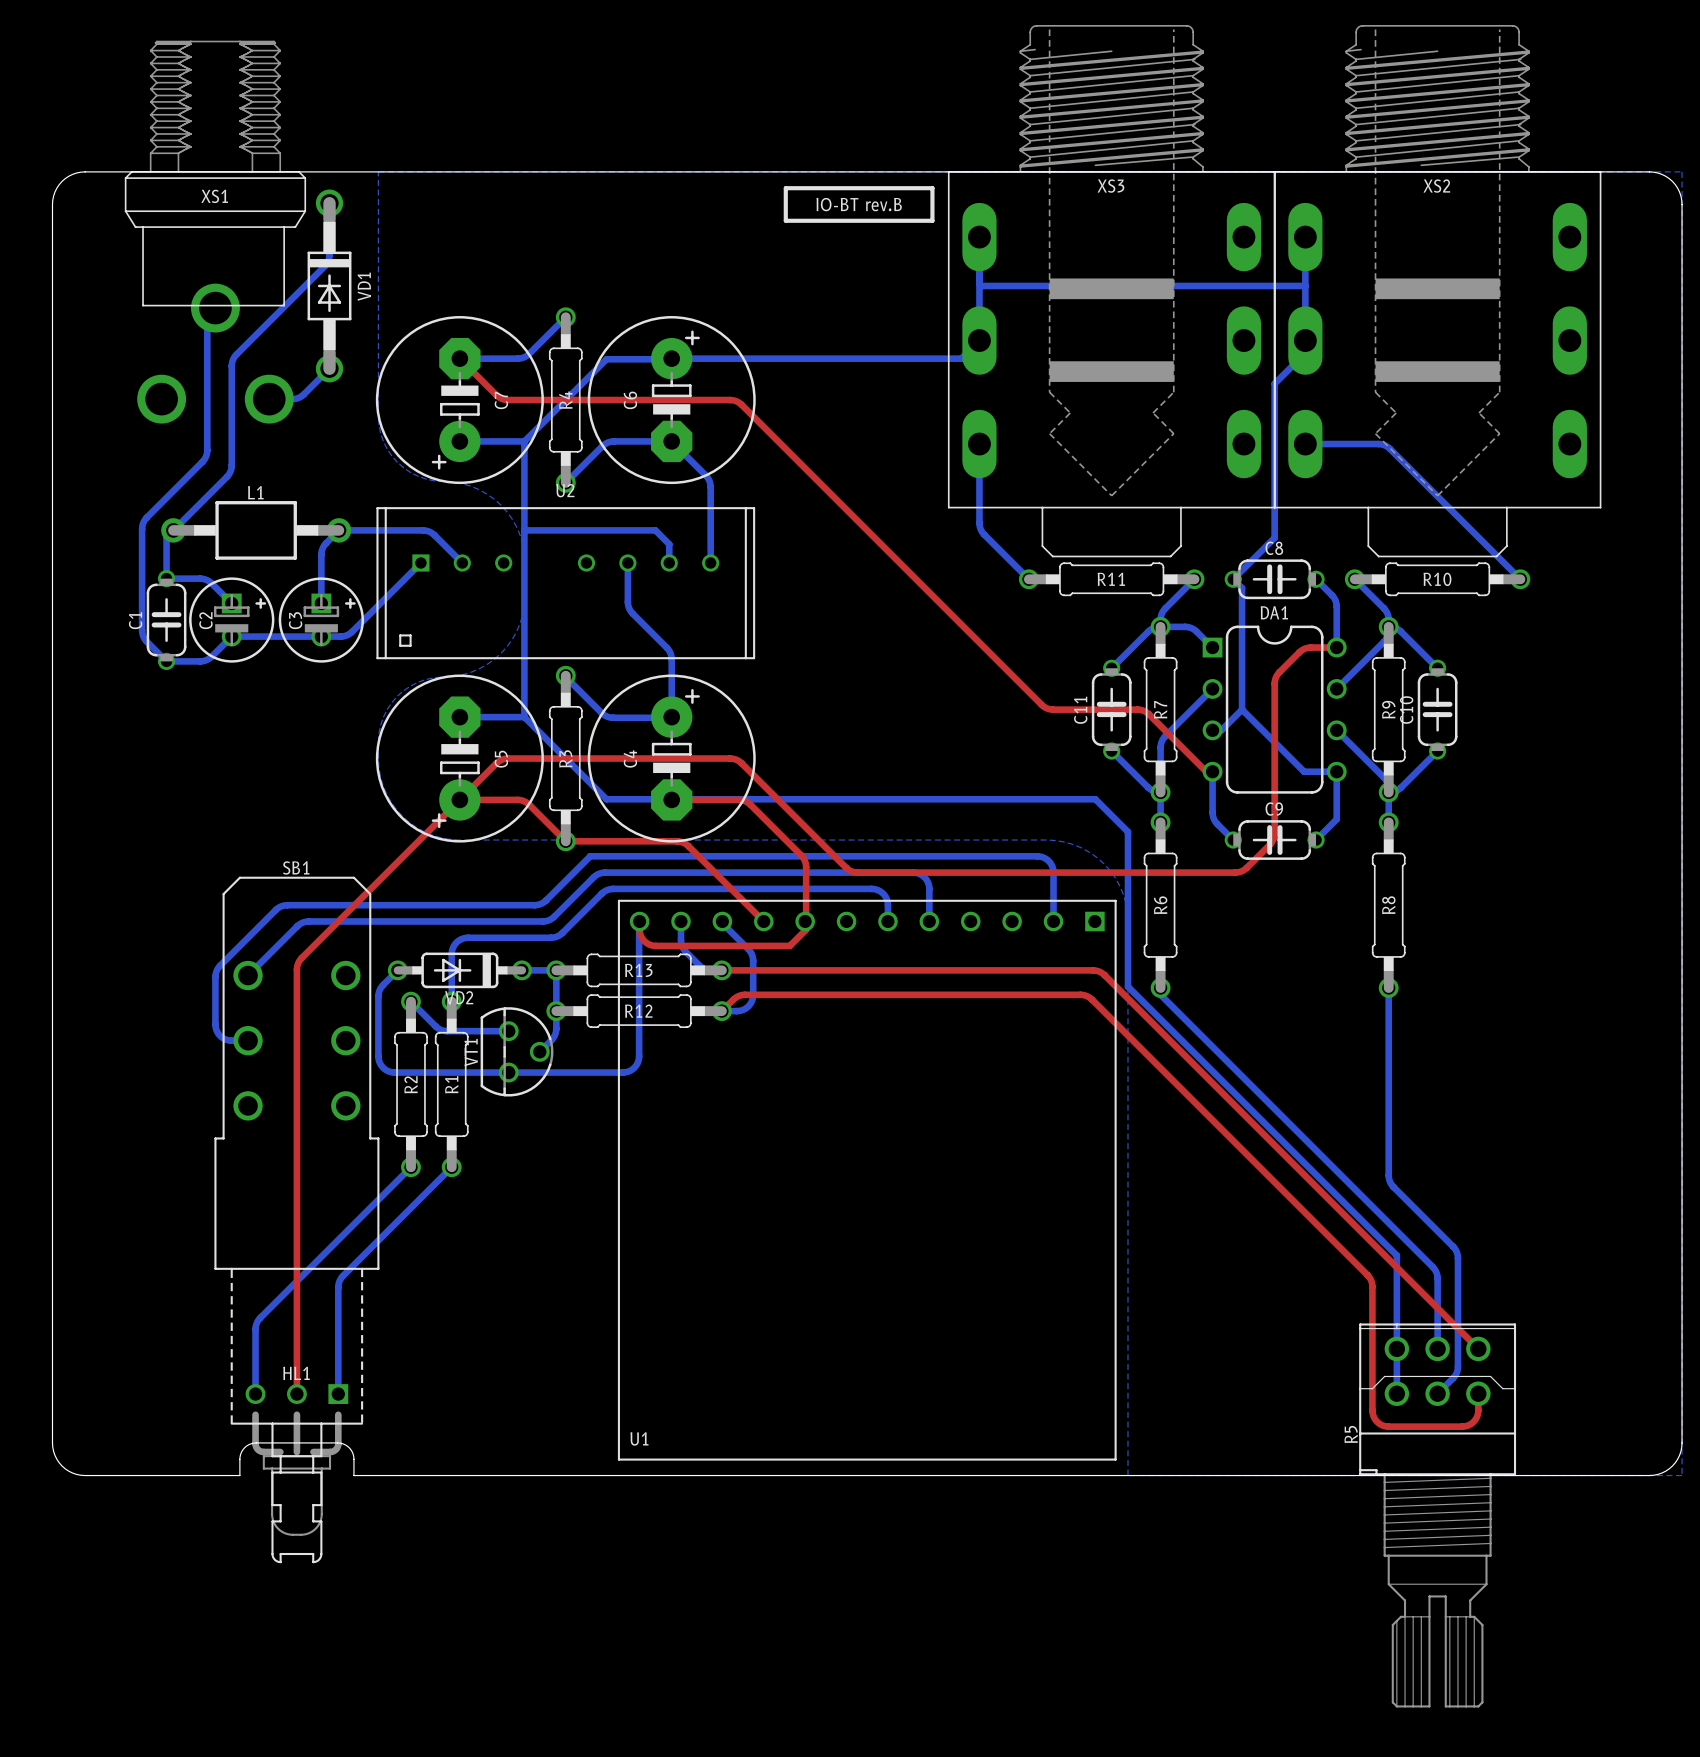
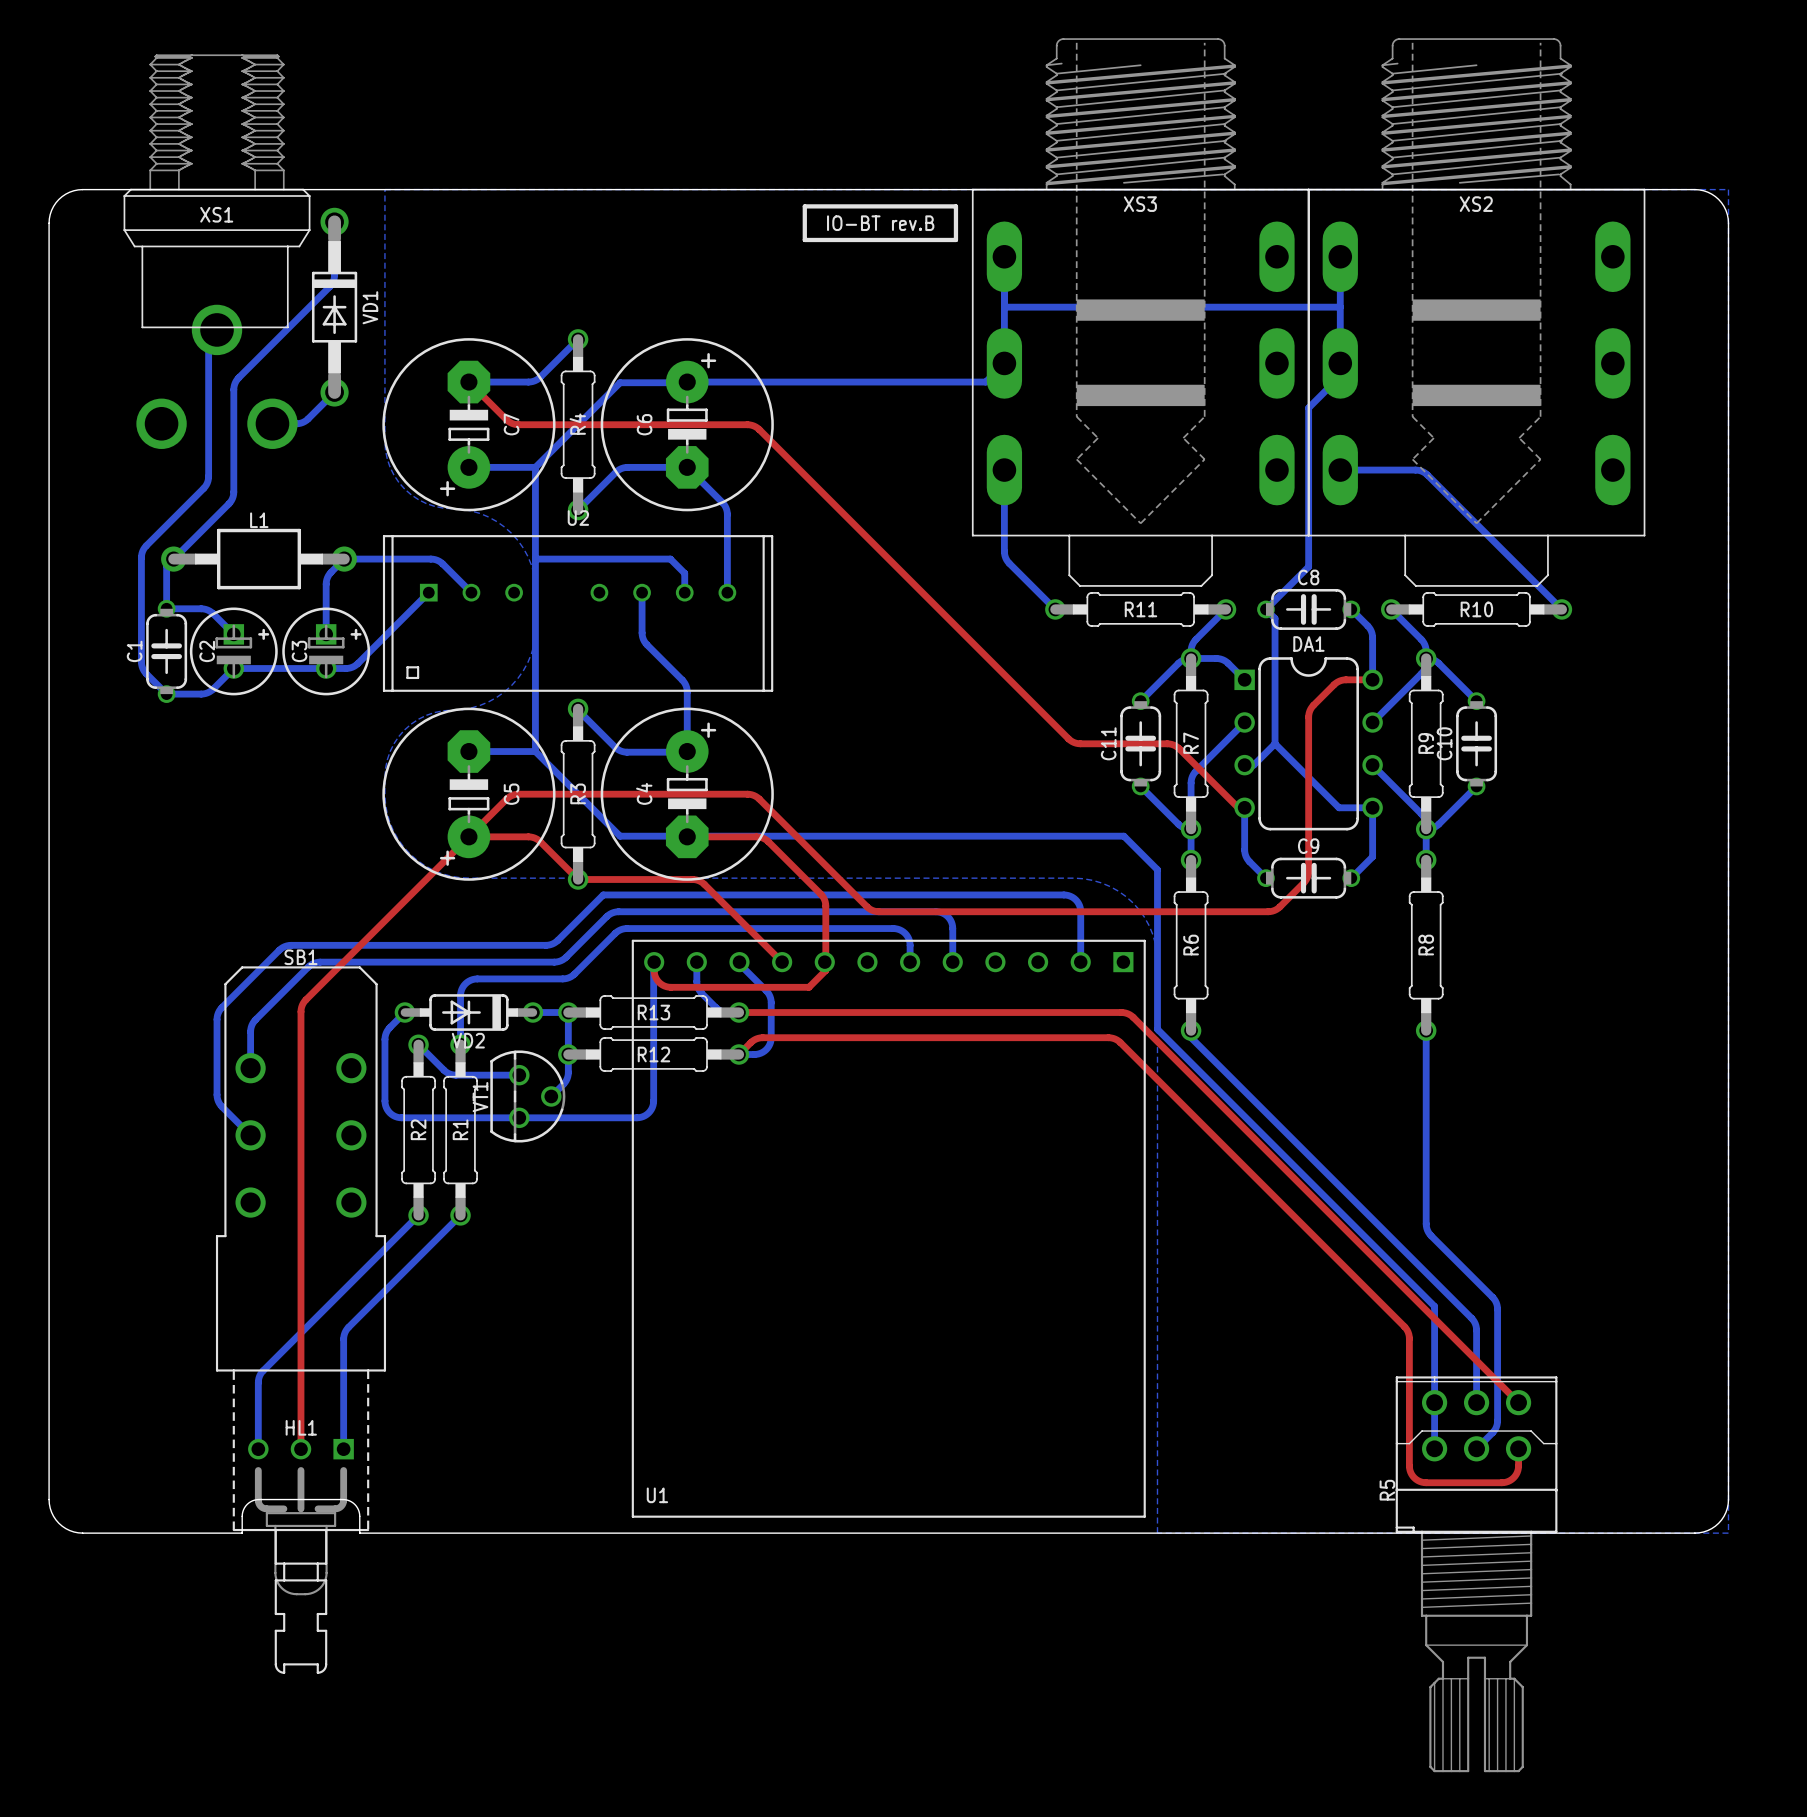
bottom track: (315, 921) (304, 922) (298, 924) (248, 975) -> (320, 962) (308, 967) (252, 1023) (250, 1031) (250, 1068)
bottom track: (215, 1024) (217, 1032) (223, 1038) (229, 1040) (248, 1040) -> (217, 1068) (217, 1094) (219, 1103) (250, 1135)
SB1 position: (296, 1219) -> (300, 1320)

